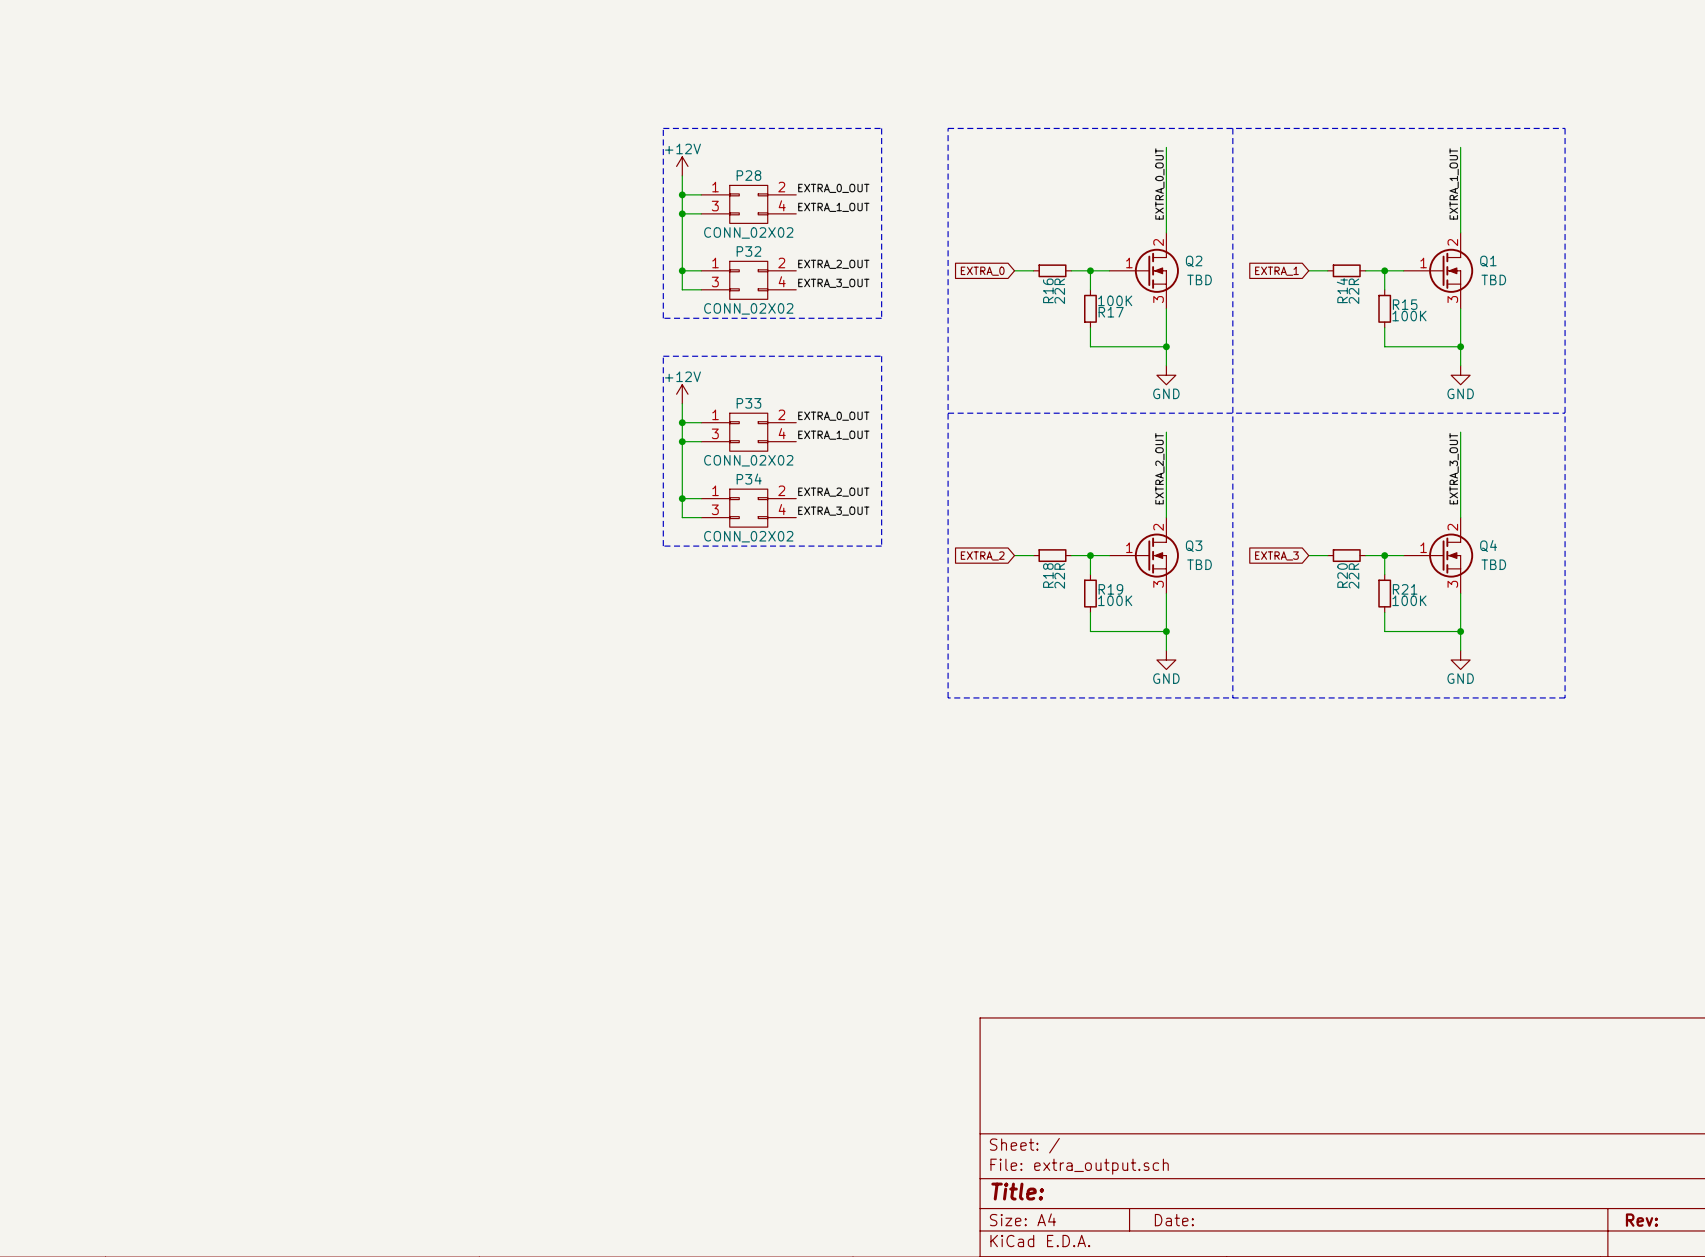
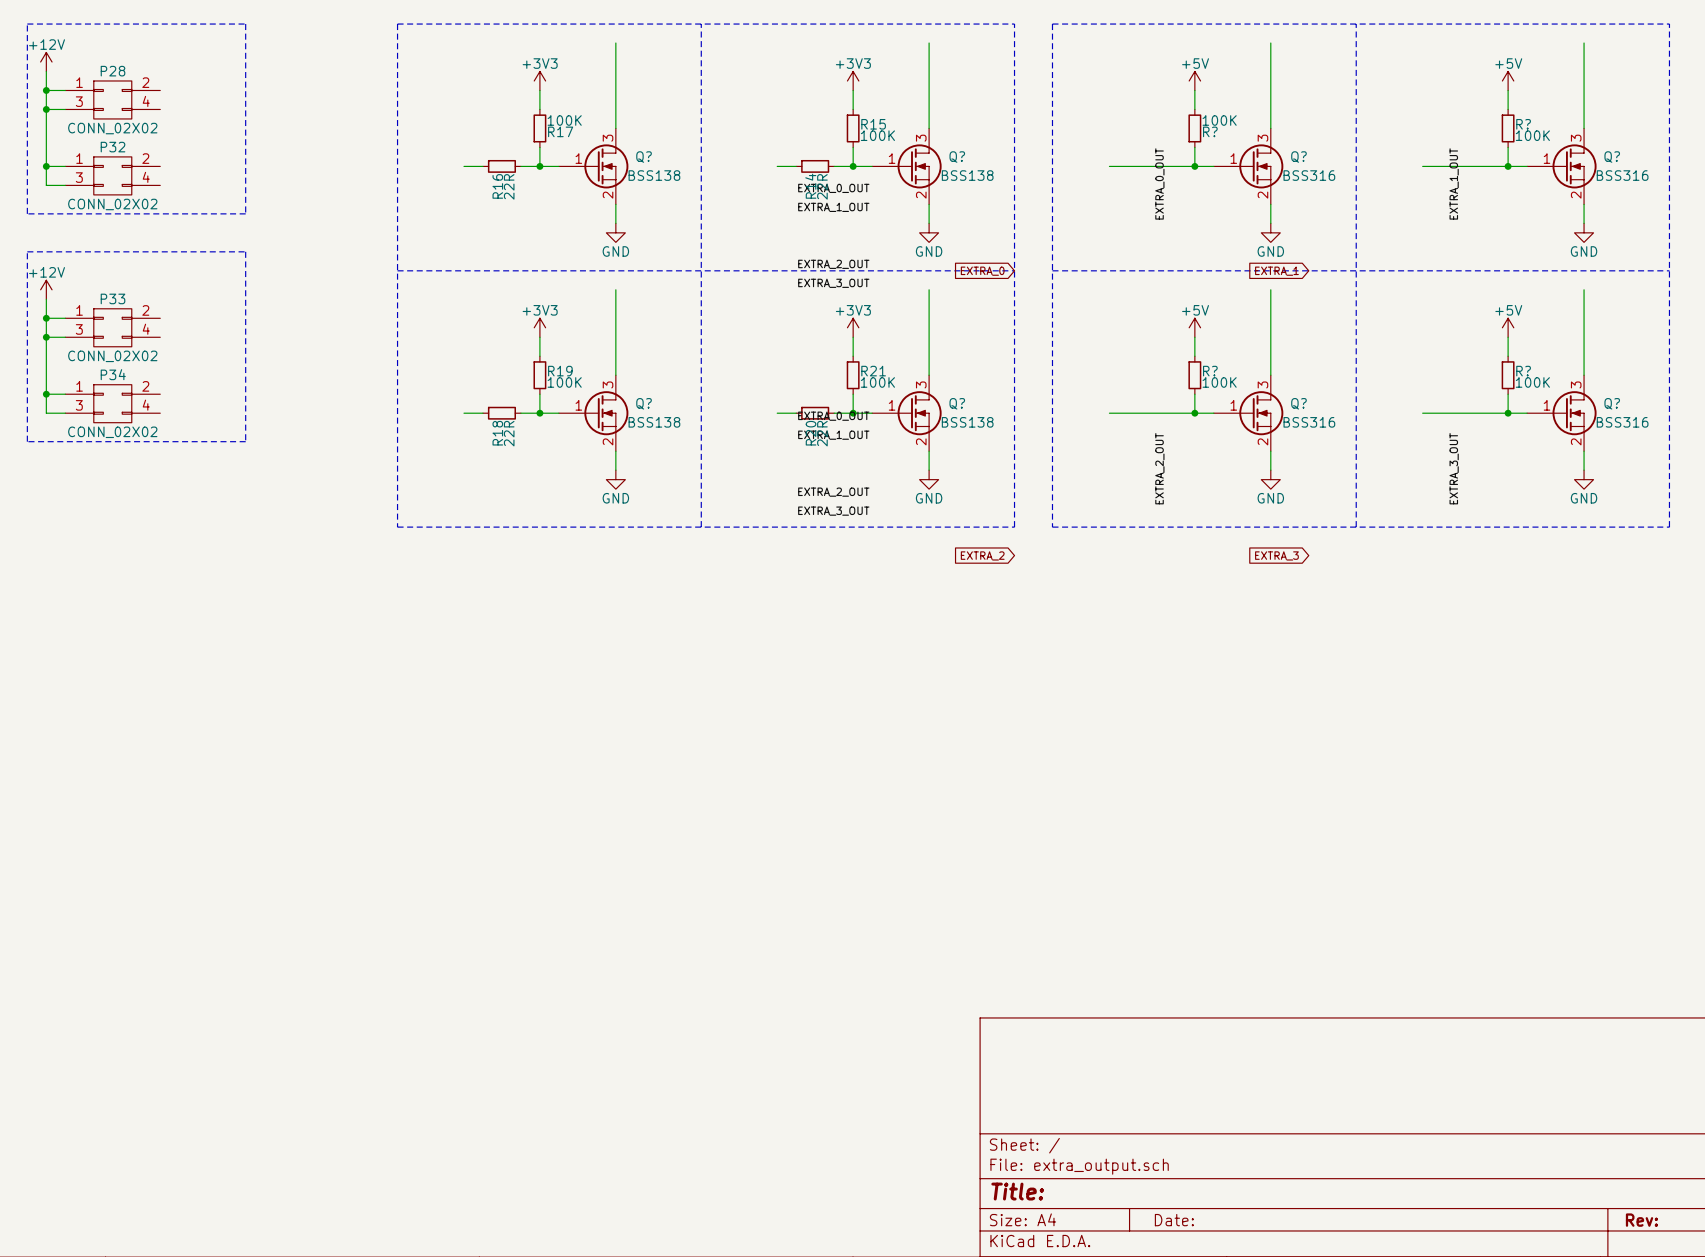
line: none -> (27, 24) (245, 24) (245, 213) (27, 213) (27, 24)
line: none -> (397, 24) (1014, 24) (1014, 527) (397, 527) (397, 24)
line: none -> (701, 24) (701, 527)
line: none -> (1052, 24) (1669, 24) (1669, 527) (1052, 527) (1052, 24)
line: none -> (1356, 24) (1356, 527)
wire: none -> (615, 43) (615, 128)
wire: none -> (929, 43) (929, 128)
power symbol: none -> +12V (46, 62)
wire: none -> (46, 71) (46, 185) (65, 185)
power symbol: none -> +3V3 (539, 80)
power symbol: none -> +3V3 (853, 80)
power symbol: none -> +5V (1194, 80)
power symbol: none -> +5V (1508, 80)
wire: none -> (46, 90) (65, 90)
junction: none -> (46, 90)
wire: none -> (539, 90) (539, 109)
wire: none -> (853, 90) (853, 109)
wire: none -> (1194, 90) (1194, 109)
wire: none -> (1508, 90) (1508, 109)
wire: none -> (46, 109) (65, 109)
junction: none -> (46, 109)
line: (663, 128) (881, 128) (881, 318) (663, 318) (663, 128) -> none
line: (948, 128) (1565, 128) (1565, 697) (948, 697) (948, 128) -> none
R?: none -> 100K (1194, 128)
line: (1232, 128) (1232, 697) -> none
R?: none -> 100K (1508, 128)
wire: none -> (539, 147) (539, 166)
wire: none -> (853, 147) (853, 166)
wire: (1166, 147) (1166, 232) -> (1270, 43) (1270, 128)
wire: none -> (1194, 147) (1194, 166)
wire: (1460, 147) (1460, 232) -> (1584, 43) (1584, 128)
wire: none -> (1508, 147) (1508, 166)
wire: none -> (46, 166) (65, 166)
junction: none -> (46, 166)
wire: none -> (463, 166) (482, 166)
wire: none -> (520, 166) (558, 166)
junction: none -> (539, 166)
Q?: none -> BSS138 (593, 166)
power symbol: +12V (682, 166) -> none
wire: none -> (834, 166) (872, 166)
junction: none -> (853, 166)
Q?: none -> BSS138 (906, 166)
wire: none -> (1109, 166) (1213, 166)
junction: none -> (1194, 166)
Q?: none -> BSS316 (1248, 166)
wire: none -> (1422, 166) (1527, 166)
junction: none -> (1508, 166)
Q?: none -> BSS316 (1561, 166)
wire: (682, 175) (682, 289) (701, 289) -> none
wire: (682, 194) (701, 194) -> (777, 166) (796, 166)
junction: (682, 194) -> none
wire: none -> (615, 204) (615, 223)
P28 position: (748, 204) -> (112, 99)
wire: none -> (929, 204) (929, 223)
wire: none -> (1584, 204) (1584, 223)
wire: (682, 213) (701, 213) -> none
junction: (682, 213) -> none
power symbol: none -> GND (615, 232)
power symbol: none -> GND (929, 232)
power symbol: none -> GND (1270, 232)
power symbol: none -> GND (1584, 232)
line: none -> (27, 251) (27, 441) (245, 441) (245, 251) (27, 251)
line: none -> (397, 270) (1014, 270)
junction: (682, 270) -> none
wire: (1014, 270) (1033, 270) -> none
R16 position: (1052, 270) -> (501, 166)
wire: (1090, 270) (1090, 289) -> (1194, 337) (1194, 356)
junction: (1090, 270) -> none
Q2: TBD (1144, 270) -> none
R14 position: (1346, 270) -> (815, 166)
wire: (1384, 270) (1384, 289) -> (1270, 204) (1270, 223)
junction: (1384, 270) -> none
Q1: TBD (1438, 270) -> none
P32 position: (748, 280) -> (112, 175)
power symbol: none -> +12V (46, 289)
wire: none -> (615, 289) (615, 375)
wire: none -> (929, 289) (929, 375)
wire: none -> (1584, 289) (1584, 375)
wire: none -> (46, 299) (46, 413) (65, 413)
R17 position: (1090, 308) -> (539, 128)
wire: (1166, 308) (1166, 365) -> none
R15 position: (1384, 308) -> (853, 128)
wire: (1460, 308) (1460, 365) -> none
wire: none -> (46, 318) (65, 318)
junction: none -> (46, 318)
power symbol: none -> +3V3 (539, 327)
power symbol: none -> +3V3 (853, 327)
wire: (1090, 327) (1090, 346) (1166, 346) -> none
power symbol: none -> +5V (1194, 327)
wire: (1384, 327) (1384, 346) (1460, 346) -> none
power symbol: none -> +5V (1508, 327)
wire: none -> (46, 337) (65, 337)
junction: none -> (46, 337)
wire: none -> (539, 337) (539, 356)
wire: none -> (853, 337) (853, 356)
wire: none -> (1508, 337) (1508, 356)
junction: (1166, 346) -> none
junction: (1460, 346) -> none
line: (663, 356) (663, 546) (881, 546) (881, 356) (663, 356) -> none
power symbol: GND (1166, 375) -> none
R?: none -> 100K (1194, 375)
power symbol: GND (1460, 375) -> none
R?: none -> 100K (1508, 375)
wire: none -> (46, 394) (65, 394)
junction: none -> (46, 394)
wire: none -> (539, 394) (539, 413)
power symbol: +12V (682, 394) -> none
wire: none -> (853, 394) (853, 413)
wire: none -> (1194, 394) (1194, 413)
wire: none -> (1508, 394) (1508, 413)
wire: (682, 403) (682, 517) (701, 517) -> none
wire: none -> (463, 413) (482, 413)
wire: none -> (520, 413) (558, 413)
junction: none -> (539, 413)
Q?: none -> BSS138 (593, 413)
wire: none -> (834, 413) (872, 413)
junction: none -> (853, 413)
Q?: none -> BSS138 (906, 413)
line: (948, 413) (1565, 413) -> (1052, 270) (1669, 270)
junction: none -> (1194, 413)
Q?: none -> BSS316 (1248, 413)
junction: none -> (1508, 413)
Q?: none -> BSS316 (1561, 413)
wire: (682, 422) (701, 422) -> none
junction: (682, 422) -> none
P33 position: (748, 432) -> (112, 327)
wire: (1166, 432) (1166, 517) -> (1270, 289) (1270, 375)
wire: (1460, 432) (1460, 517) -> none
wire: (682, 441) (701, 441) -> (777, 413) (796, 413)
junction: (682, 441) -> none
wire: none -> (615, 451) (615, 470)
wire: none -> (929, 451) (929, 470)
wire: none -> (1584, 451) (1584, 470)
power symbol: none -> GND (615, 479)
power symbol: none -> GND (929, 479)
power symbol: none -> GND (1270, 479)
power symbol: none -> GND (1584, 479)
wire: (682, 498) (701, 498) -> none
junction: (682, 498) -> none
P34 position: (748, 508) -> (112, 403)
wire: (1014, 555) (1033, 555) -> none
R18 position: (1052, 555) -> (501, 413)
wire: (1071, 555) (1109, 555) -> none
wire: (1090, 555) (1090, 574) -> none
junction: (1090, 555) -> none
Q3: TBD (1144, 555) -> none
wire: (1308, 555) (1327, 555) -> none
R20 position: (1346, 555) -> (815, 413)
wire: (1365, 555) (1403, 555) -> none
wire: (1384, 555) (1384, 574) -> (1270, 451) (1270, 470)
junction: (1384, 555) -> none
Q4: TBD (1438, 555) -> none
R19 position: (1090, 593) -> (539, 375)
wire: (1166, 593) (1166, 650) -> none
R21 position: (1384, 593) -> (853, 375)
wire: (1460, 593) (1460, 650) -> none
wire: (1090, 612) (1090, 631) (1166, 631) -> none
wire: (1384, 612) (1384, 631) (1460, 631) -> none
junction: (1166, 631) -> none
junction: (1460, 631) -> none
power symbol: GND (1166, 659) -> none
power symbol: GND (1460, 659) -> none

